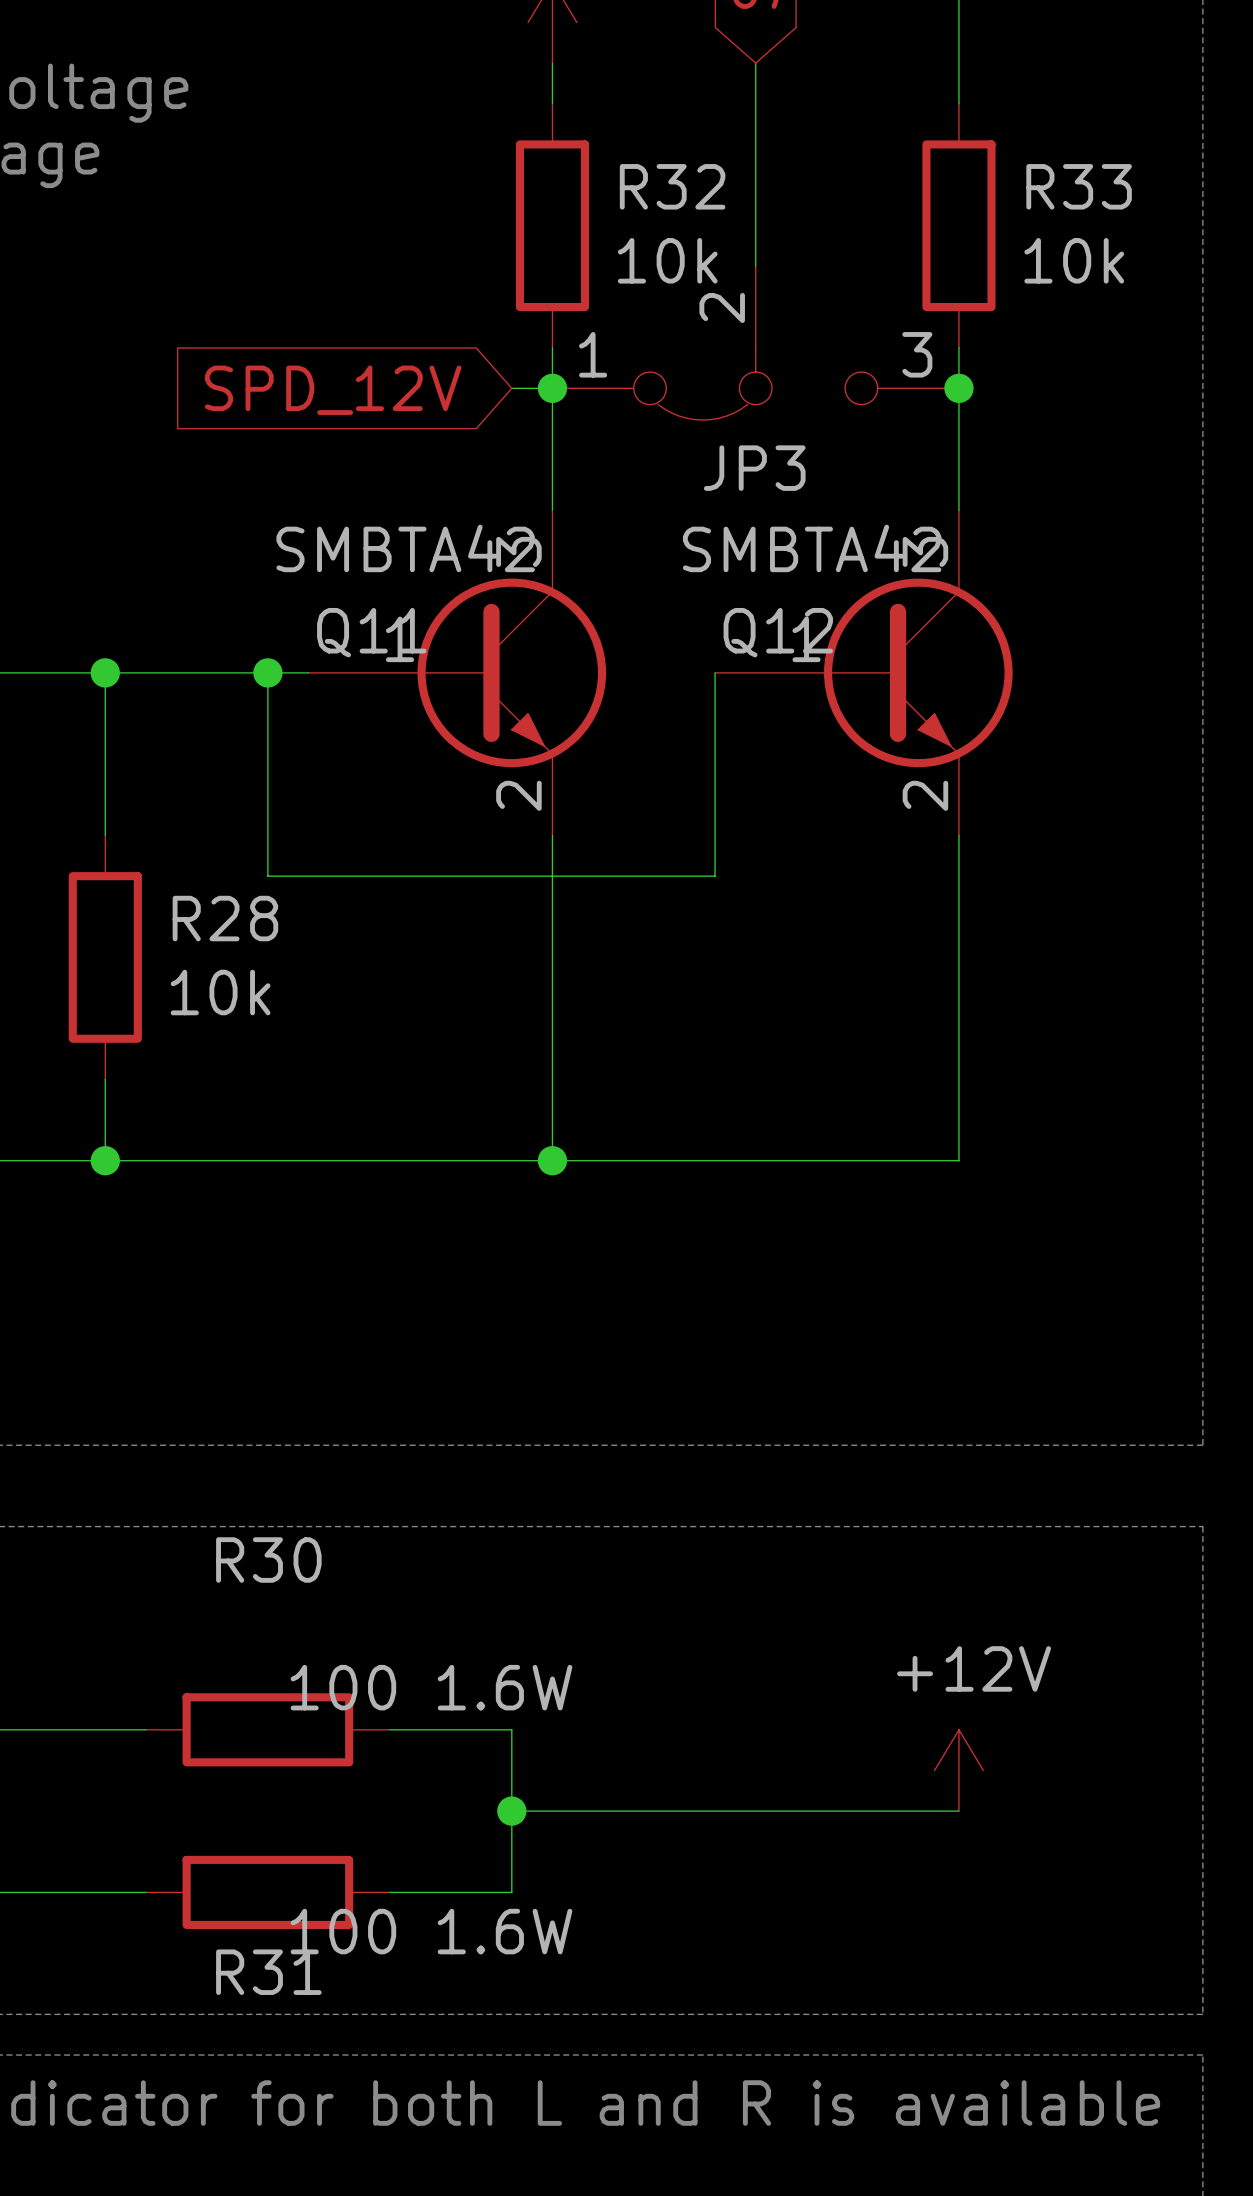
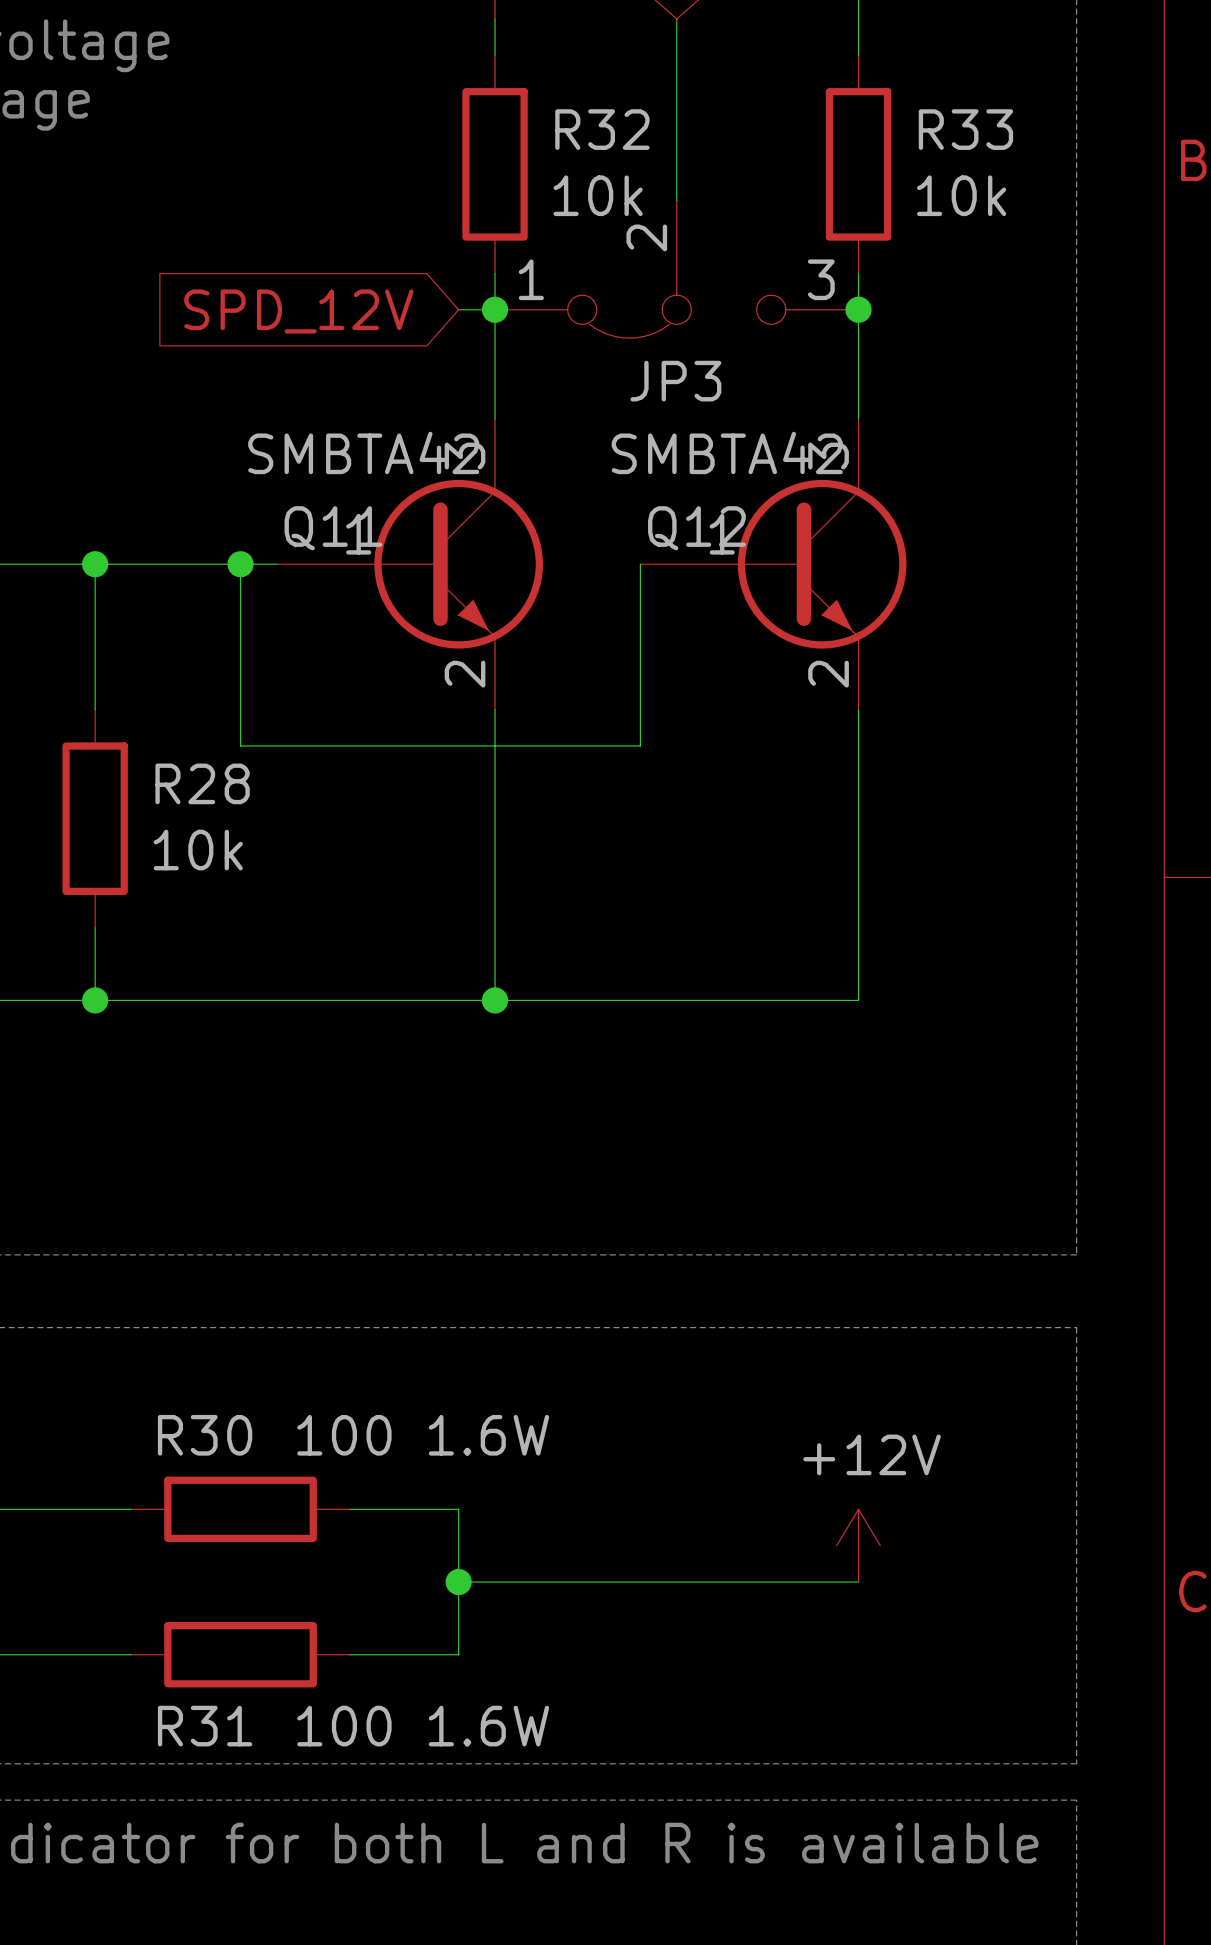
R30 name position: R30 (268, 1560) -> R30 (205, 1435)
R30 value position: 100 1.6W (431, 1687) -> 100 1.6W (423, 1435)
R31 value position: 100 1.6W (431, 1931) -> 100 1.6W (423, 1726)
R31 name position: R31 (268, 1972) -> R31 (205, 1726)

